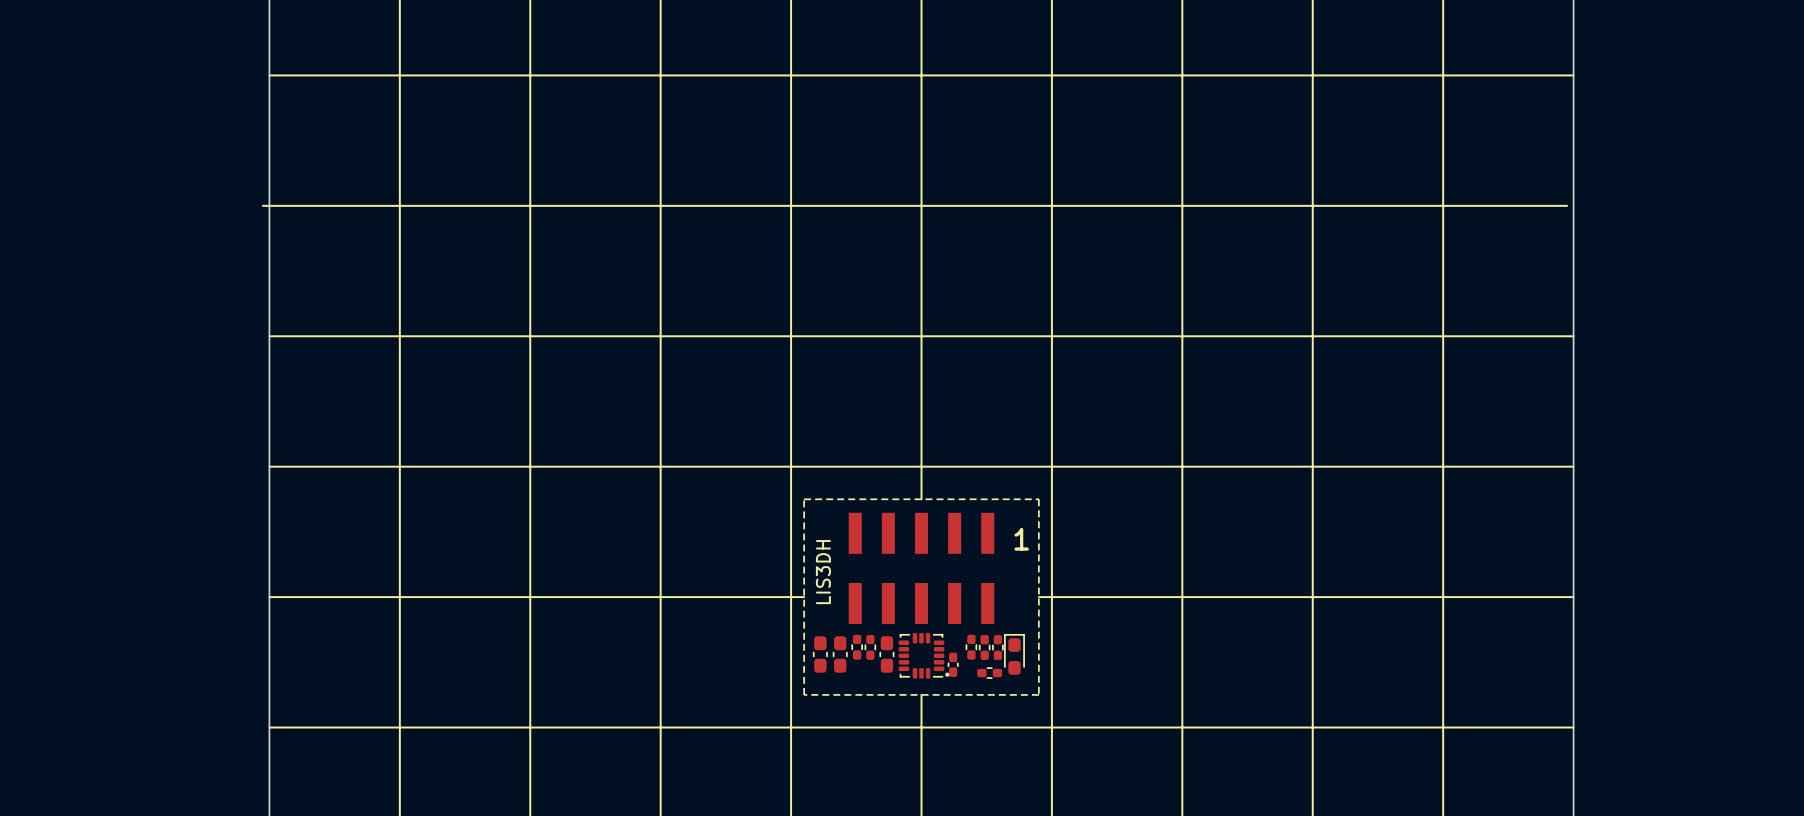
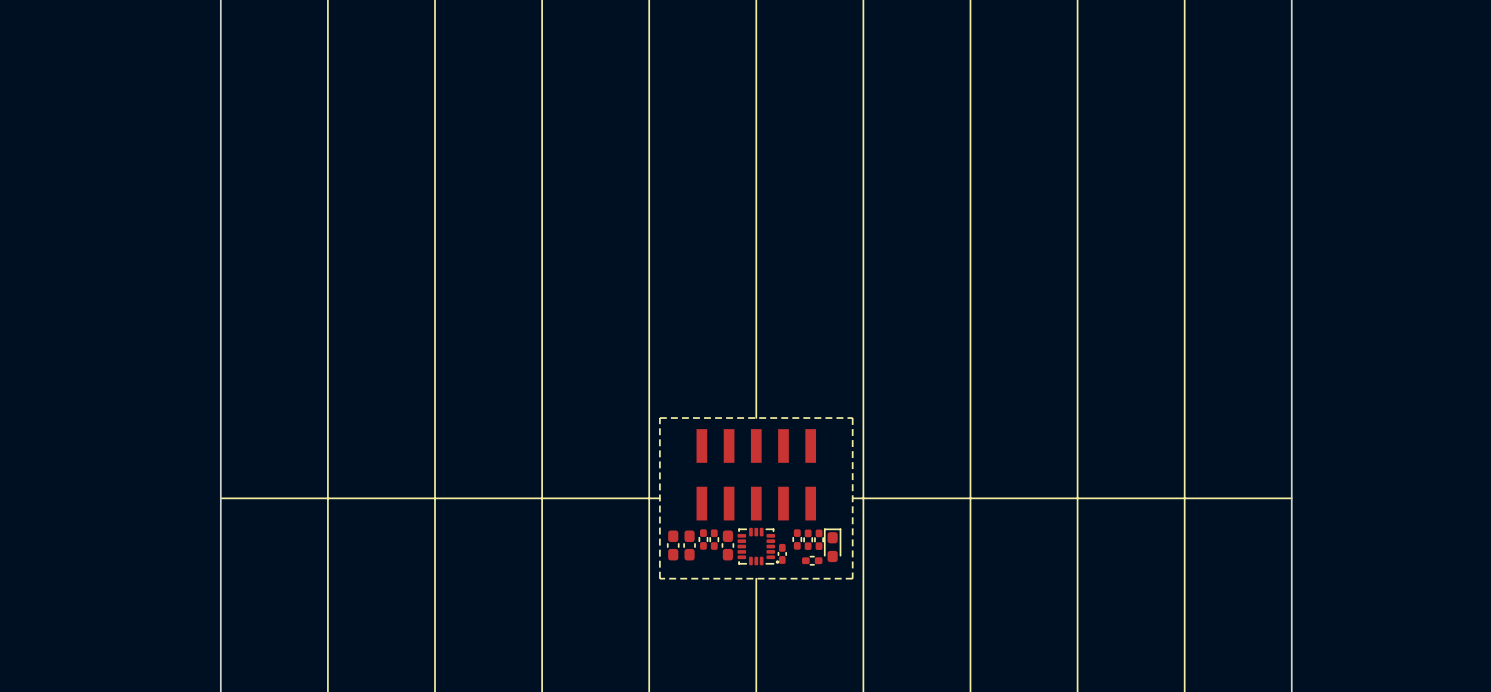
line: (269, 75) (1573, 75) -> none
line: (262, 205) (1567, 205) -> none
line: (269, 336) (1573, 336) -> none
line: (269, 466) (1573, 466) -> none
text: 1 (1021, 539) -> none
text: LIS3DH (823, 572) -> none
line: (269, 727) (1573, 727) -> none

